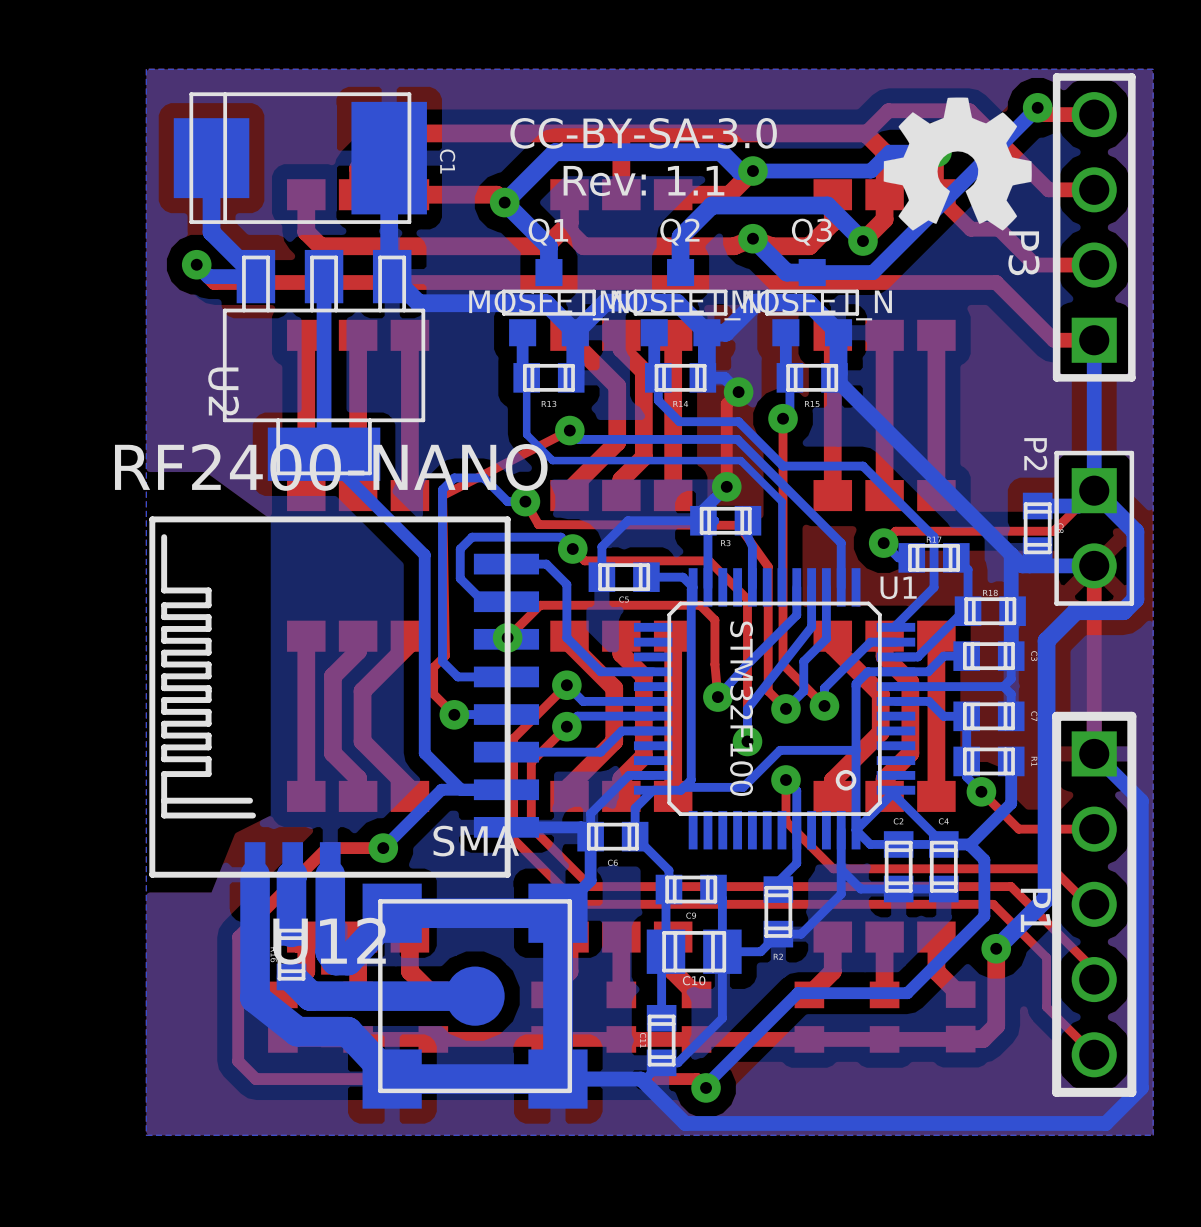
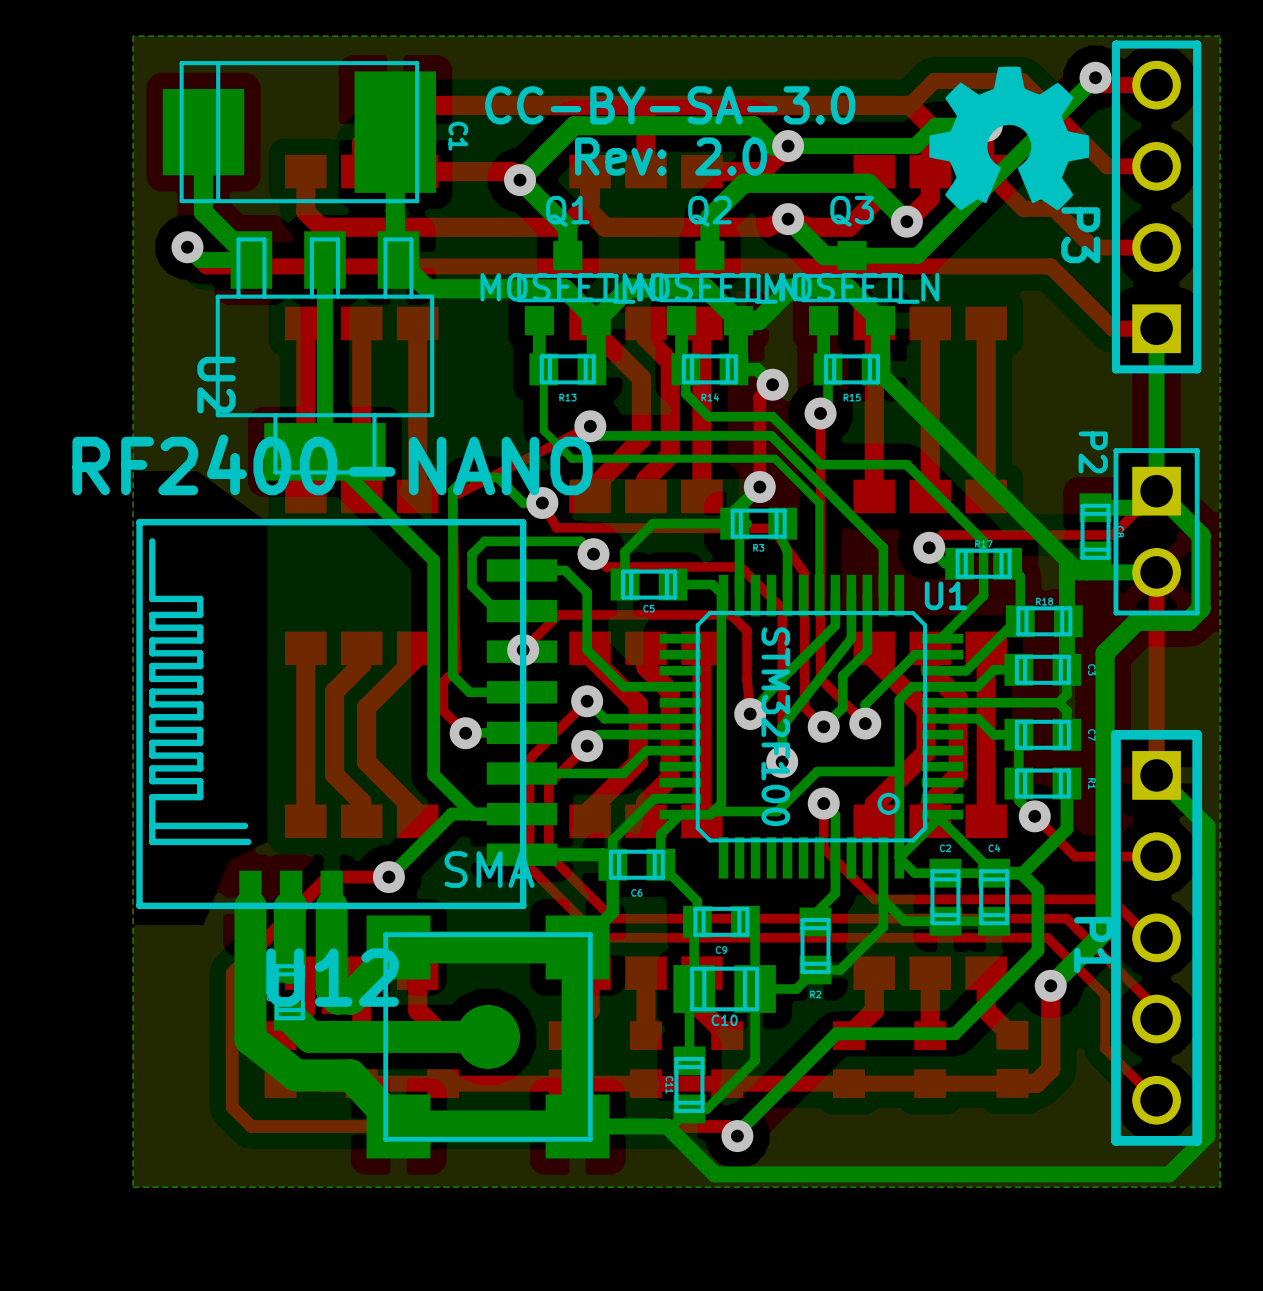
text: Rev: 1.1 (643, 181) -> Rev: 2.0 (671, 156)

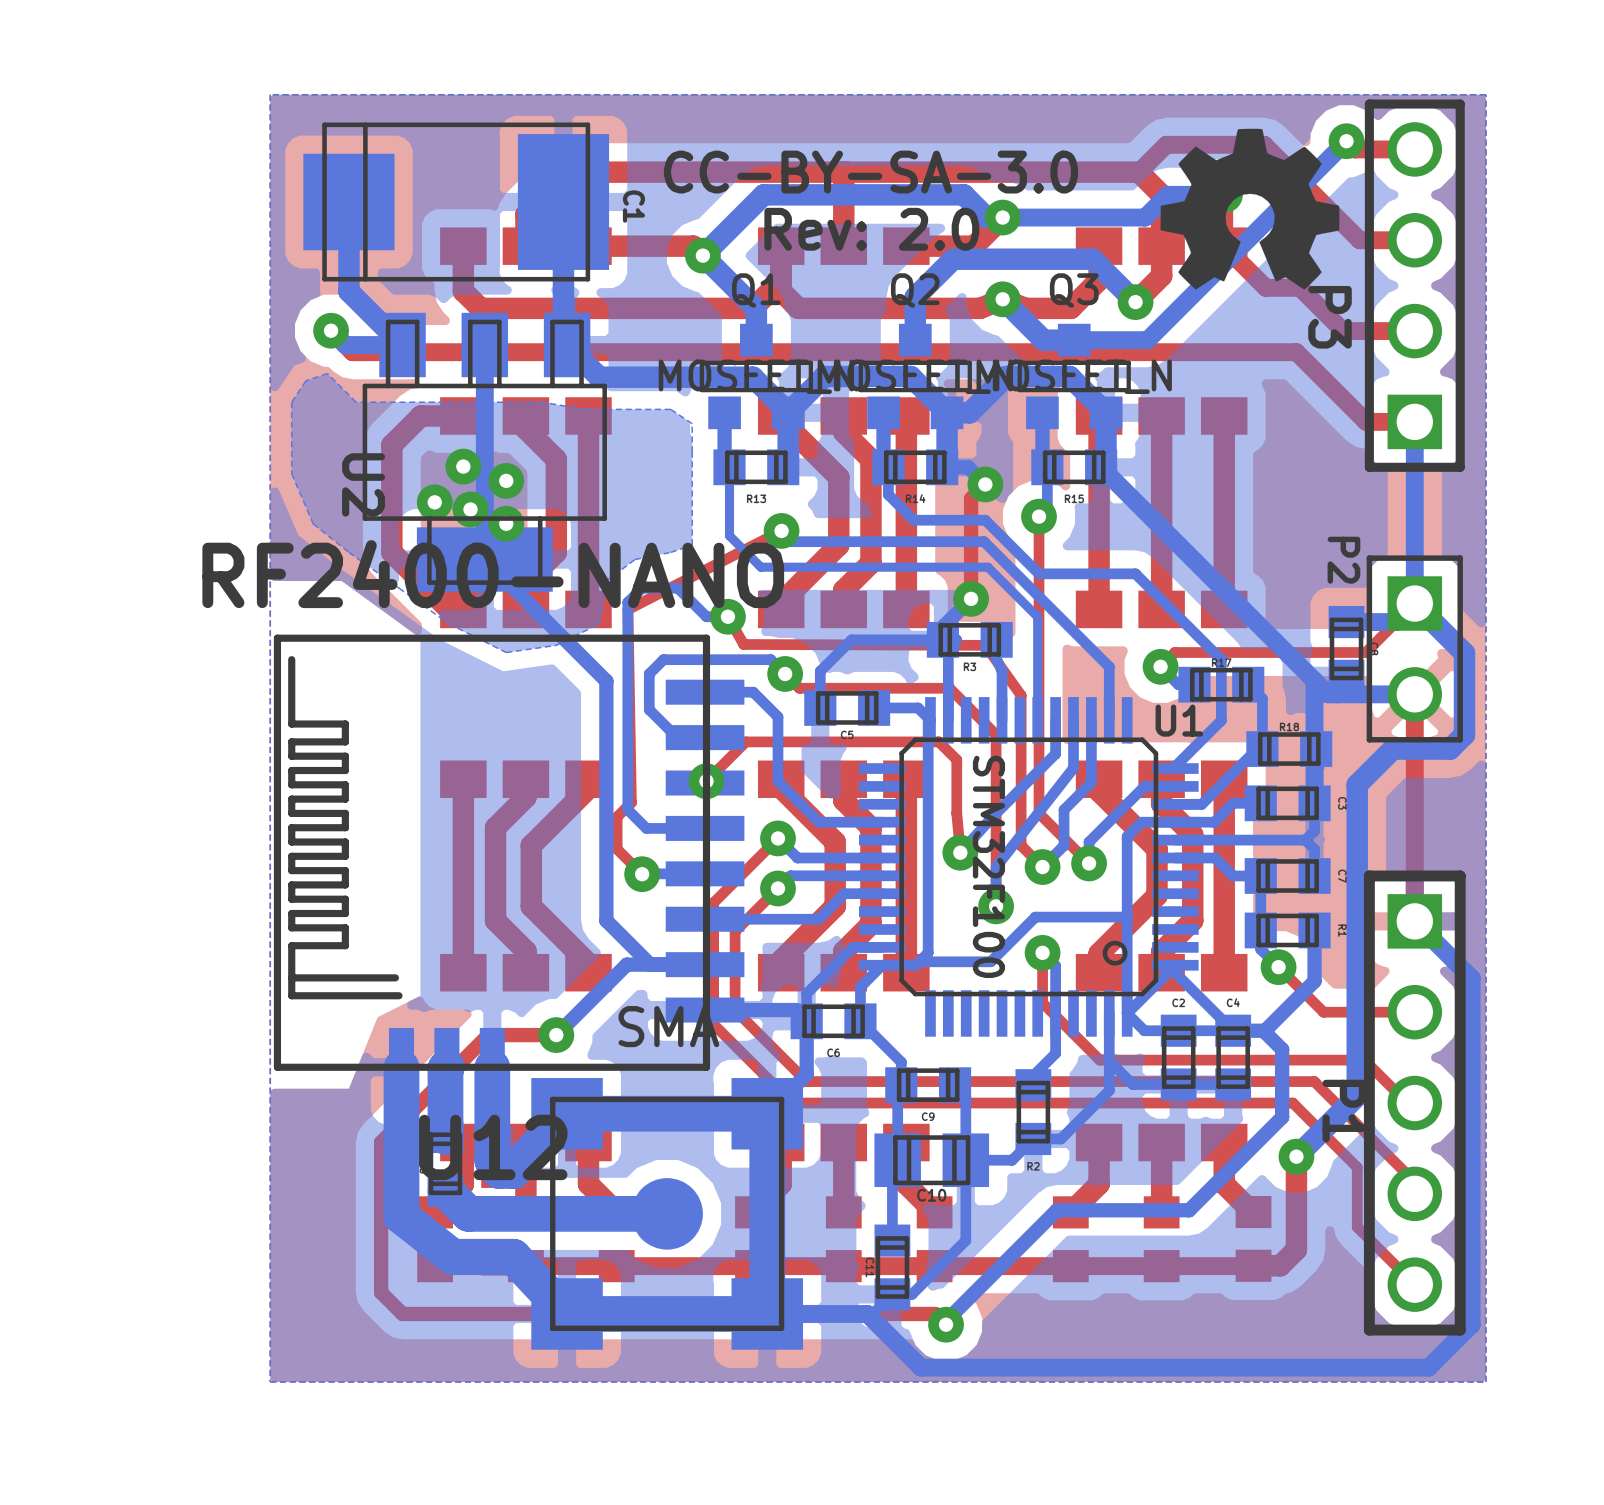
bottom zone outline: none -> (327, 373) (356, 402) (542, 402) (584, 409) (670, 409) (692, 423) (692, 545) (670, 552) (634, 559) (606, 581) (599, 623) (556, 645) (506, 652) (449, 623) (348, 552) (313, 523) (291, 473) (291, 402) (306, 380) (327, 373)
top track: (305, 323) (305, 496) -> (463, 415) (420, 415) (391, 445) (391, 552) (448, 609) (463, 609)
top track: (361, 335) (361, 472) -> (525, 429) (556, 459) (556, 552) (525, 582)
via: none -> (463, 466)
via: none -> (506, 480)
via: none -> (434, 502)
via: none -> (470, 509)
via: none -> (506, 523)

